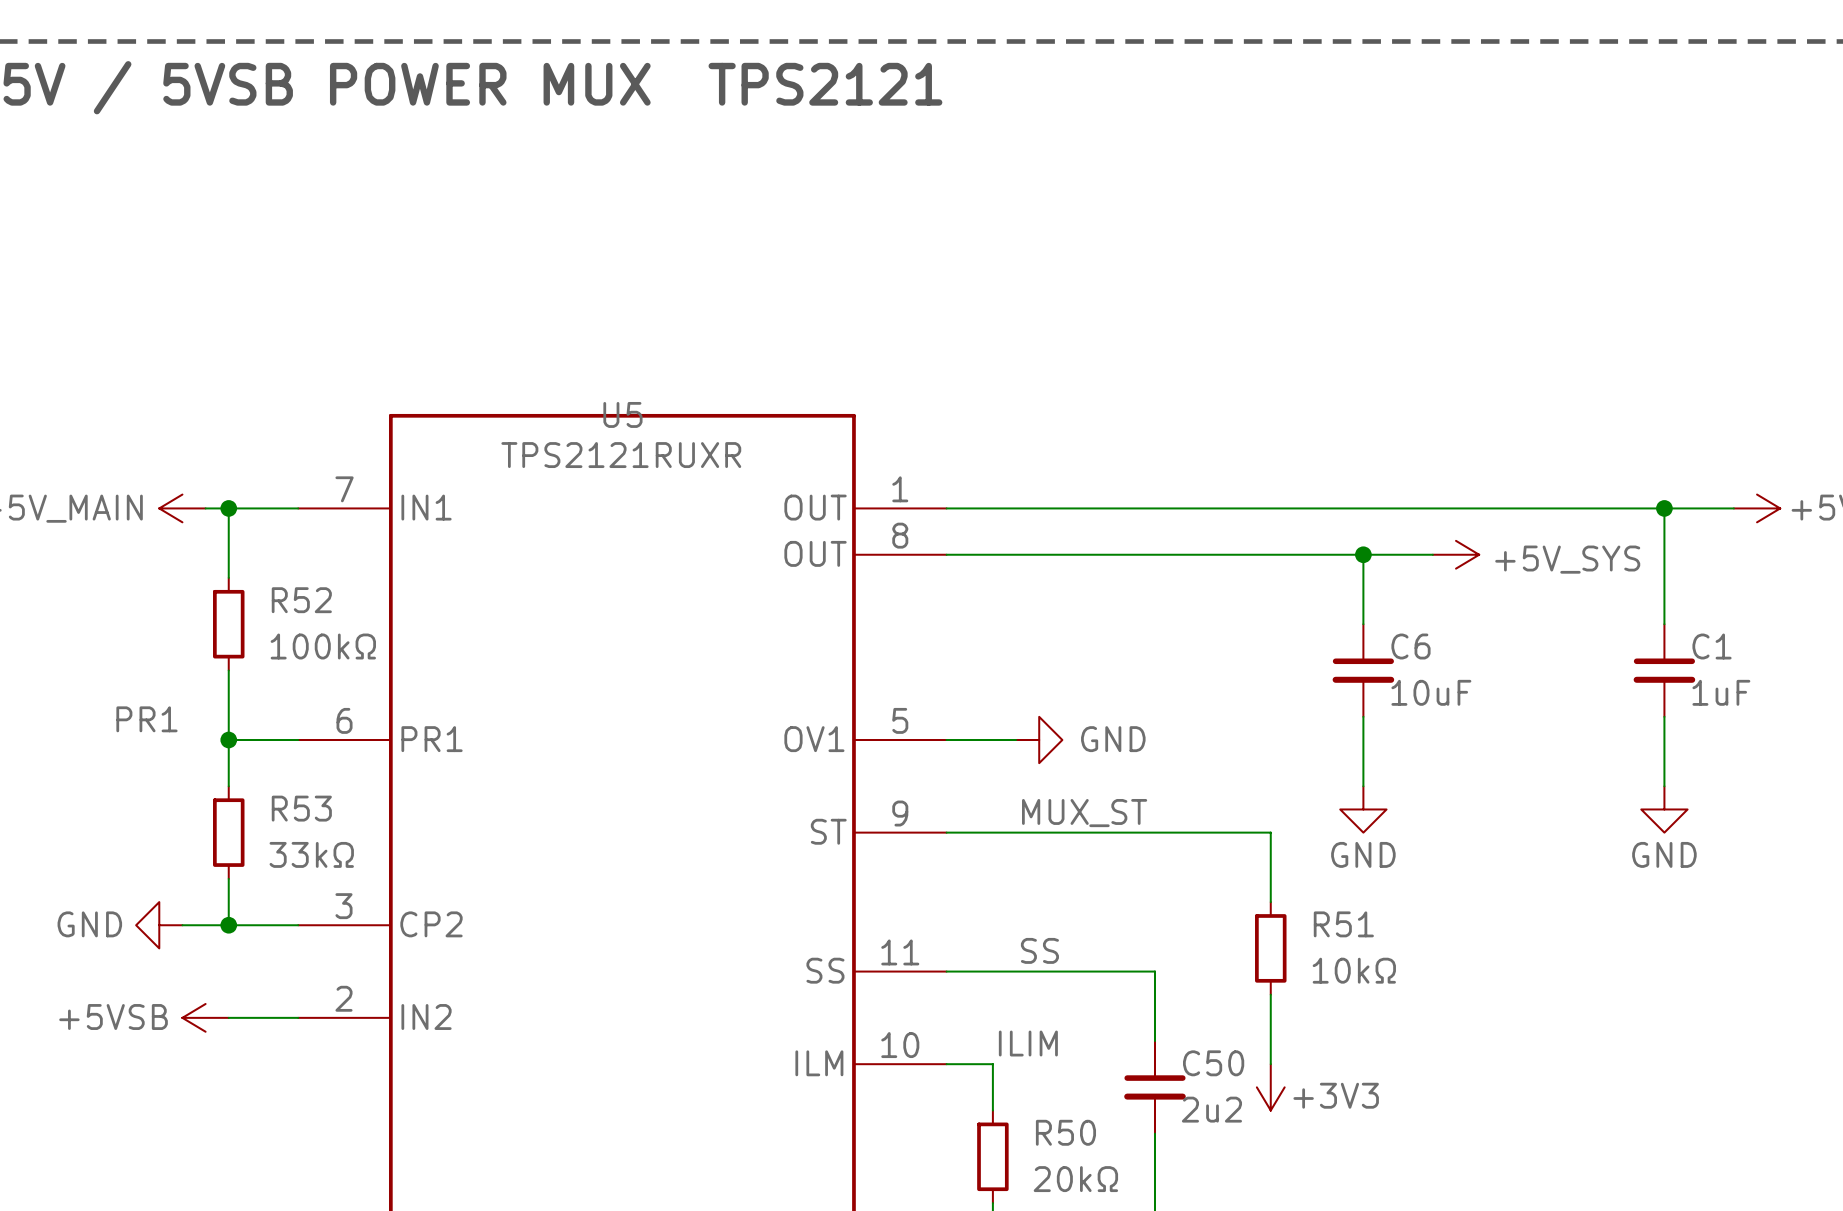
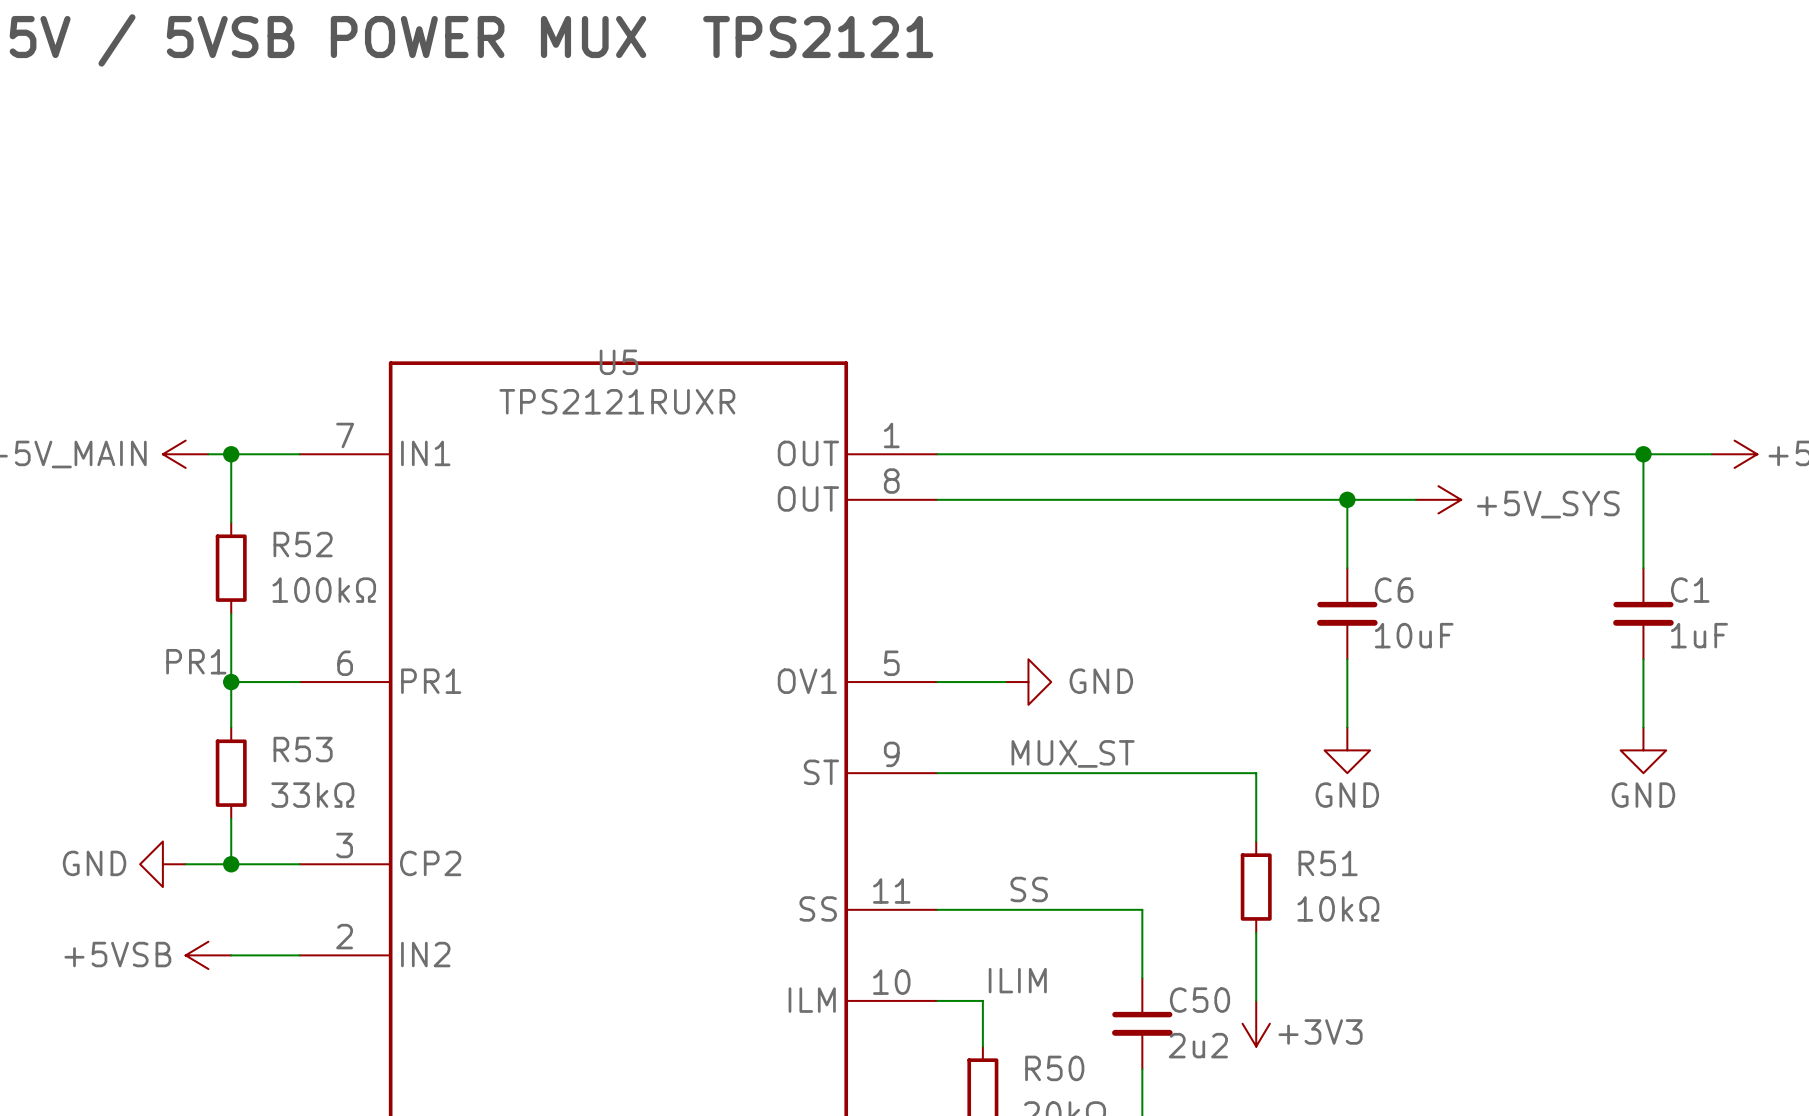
label position: PR1 (146, 719) -> PR1 (196, 661)

